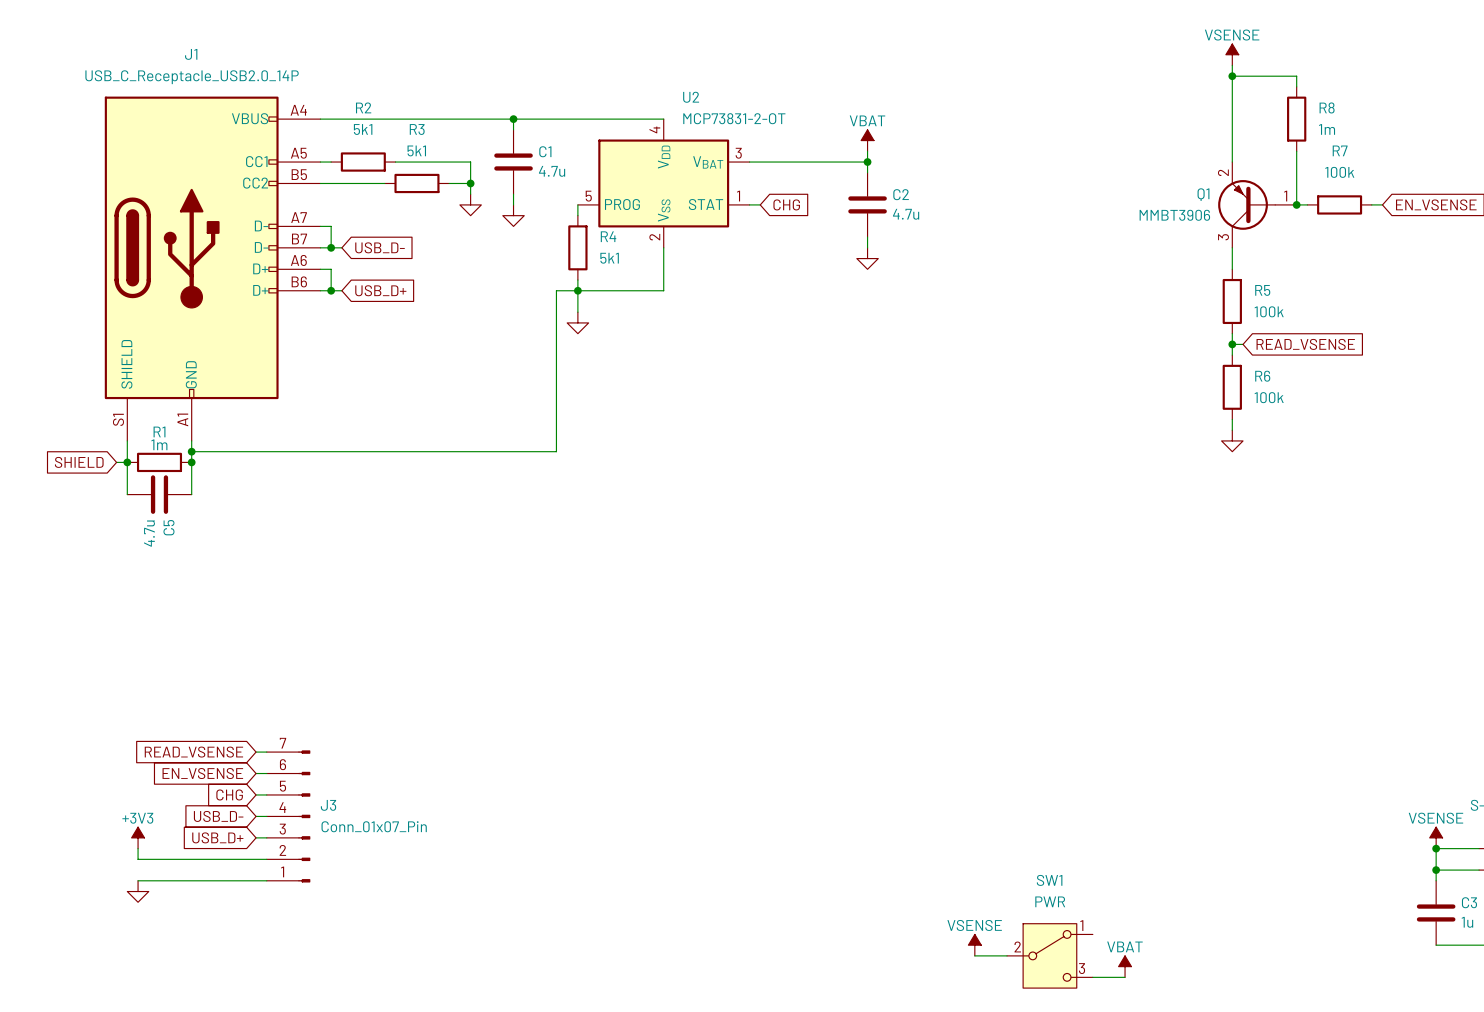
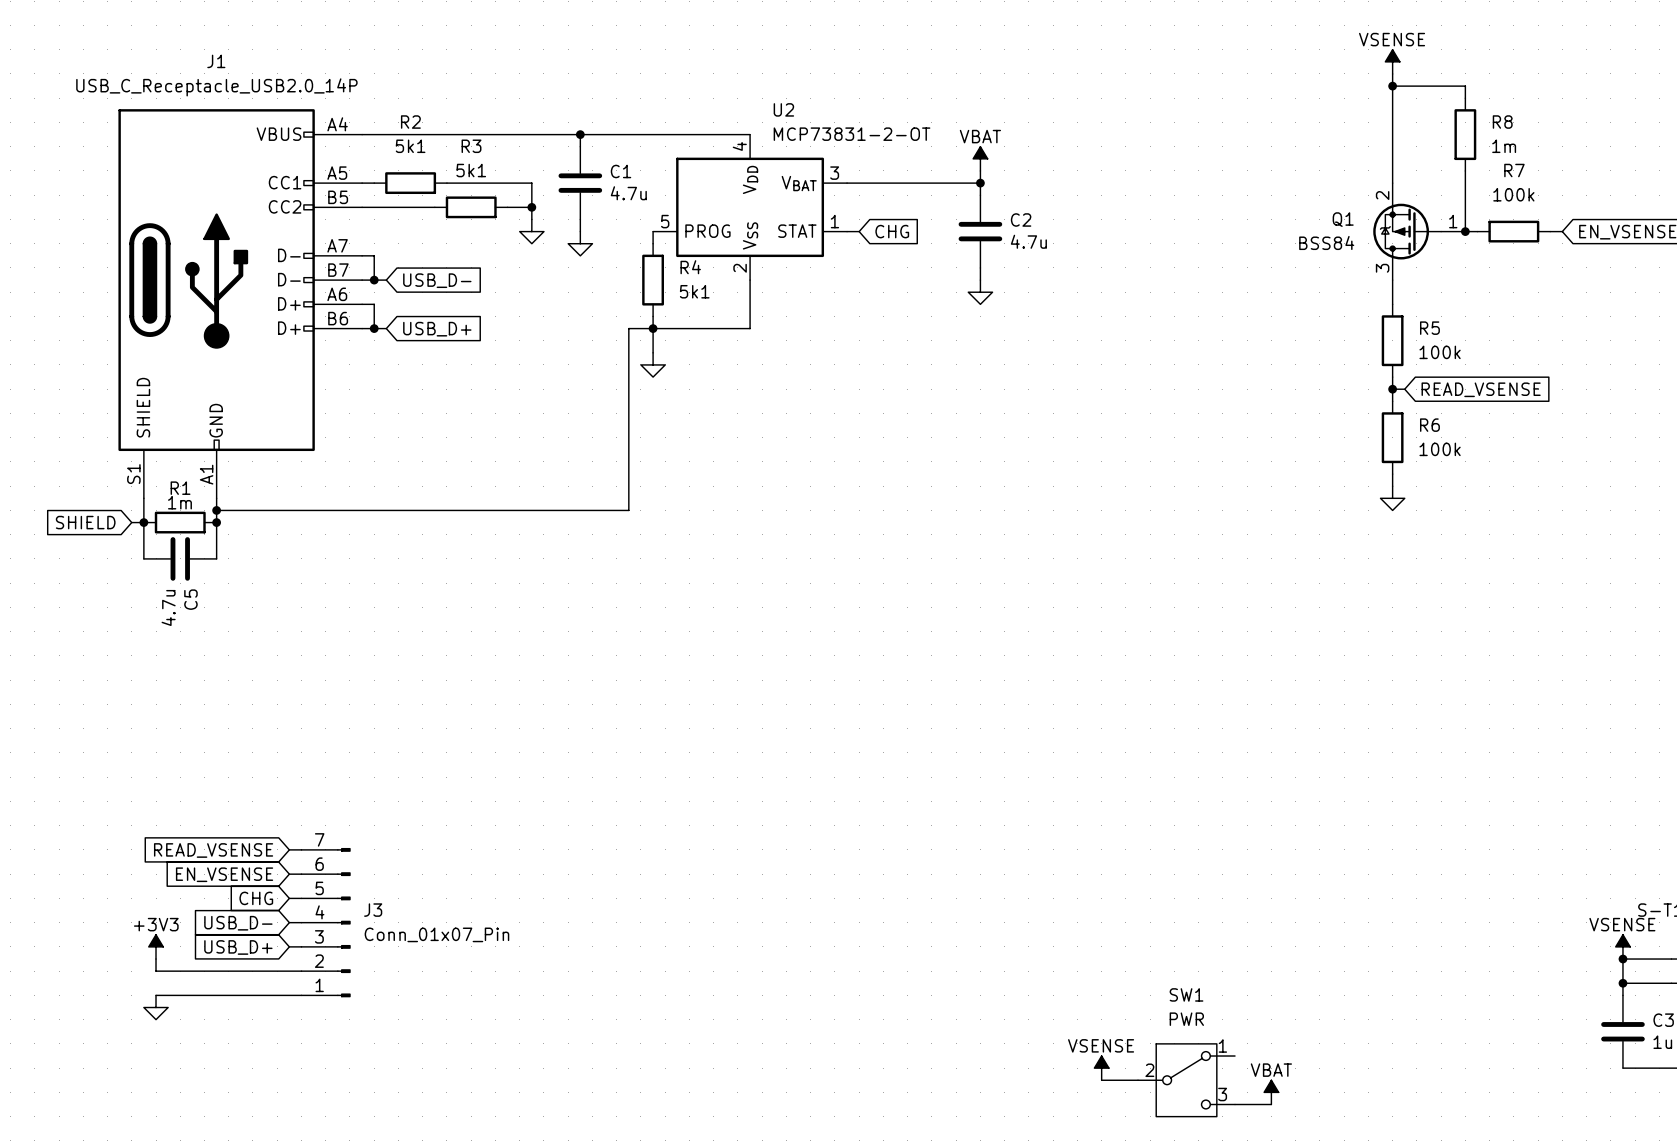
Q1 symbol: [1218, 162, 1297, 248] -> [1373, 183, 1466, 281]
Q1 value: MMBT3906 (1174, 215) -> BSS84 (1326, 242)

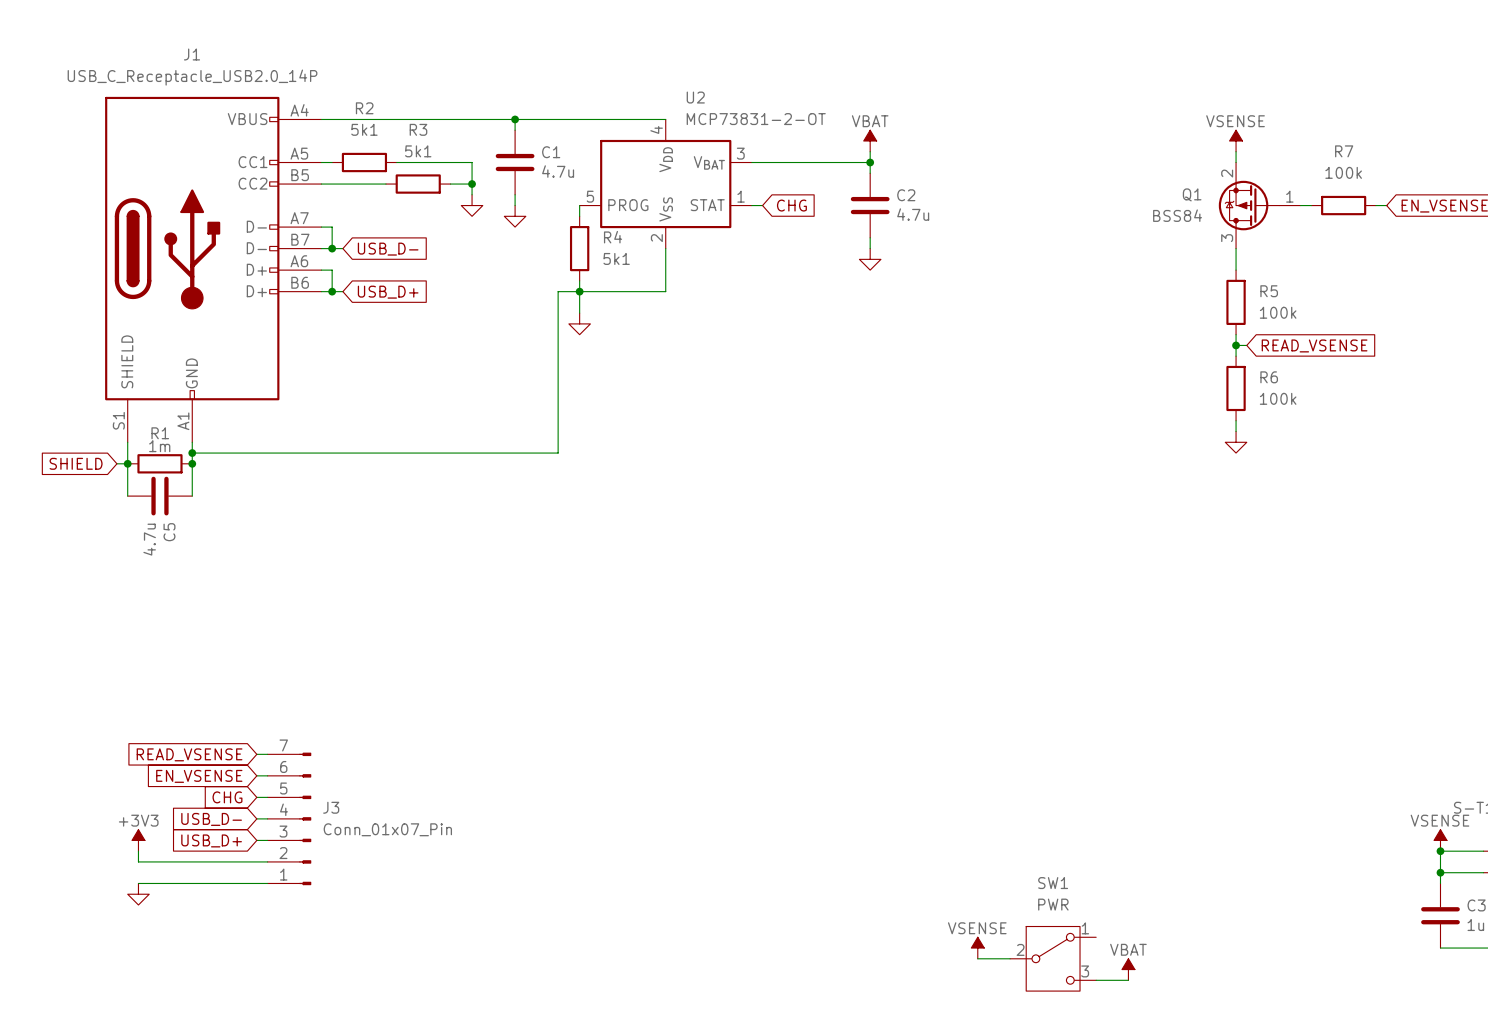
power symbol position: VSENSE (1392, 61) -> VSENSE (1236, 140)
wire: (1392, 73) (1392, 170) -> none
wire: (1392, 86) (1465, 86) (1465, 98) -> none
junction: (1392, 86) -> none
R8: 1m (1465, 134) -> none
wire: (1465, 170) (1465, 231) -> none
junction: (1465, 231) -> none

